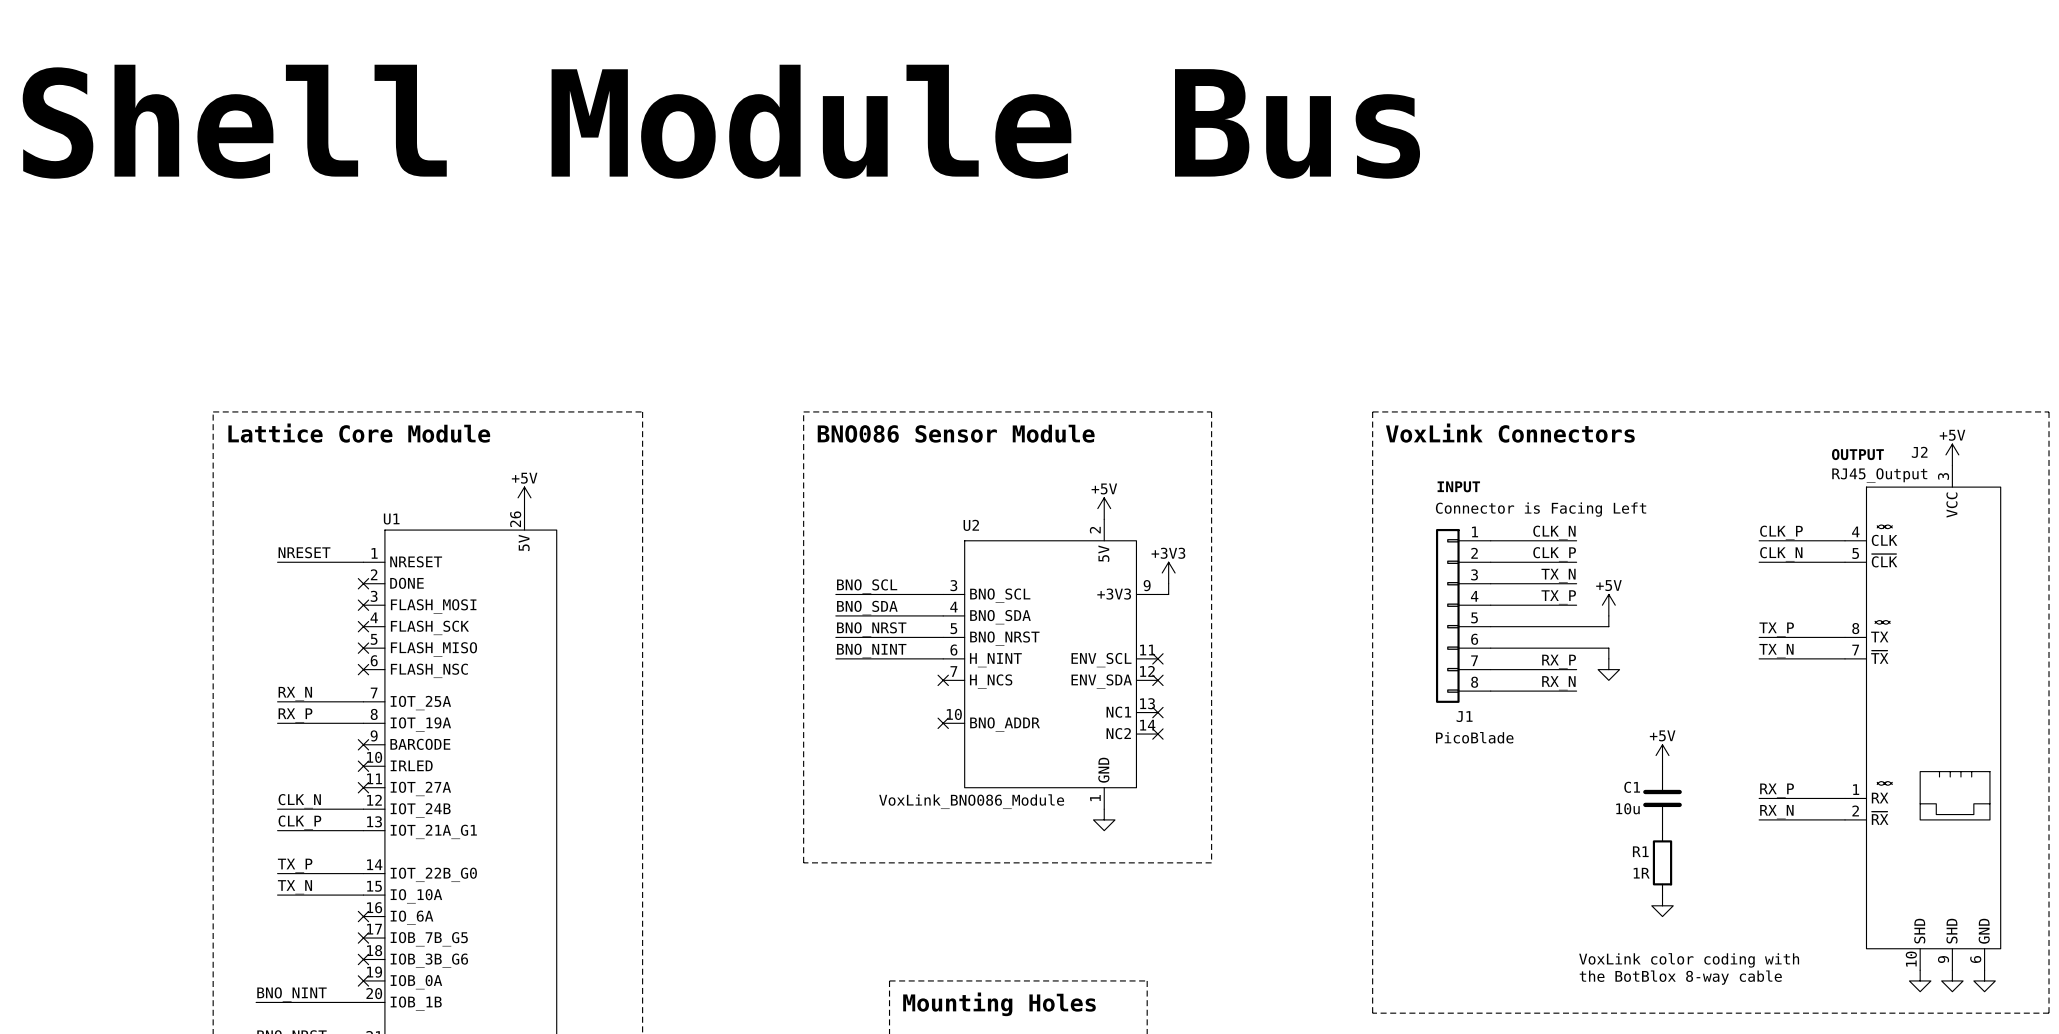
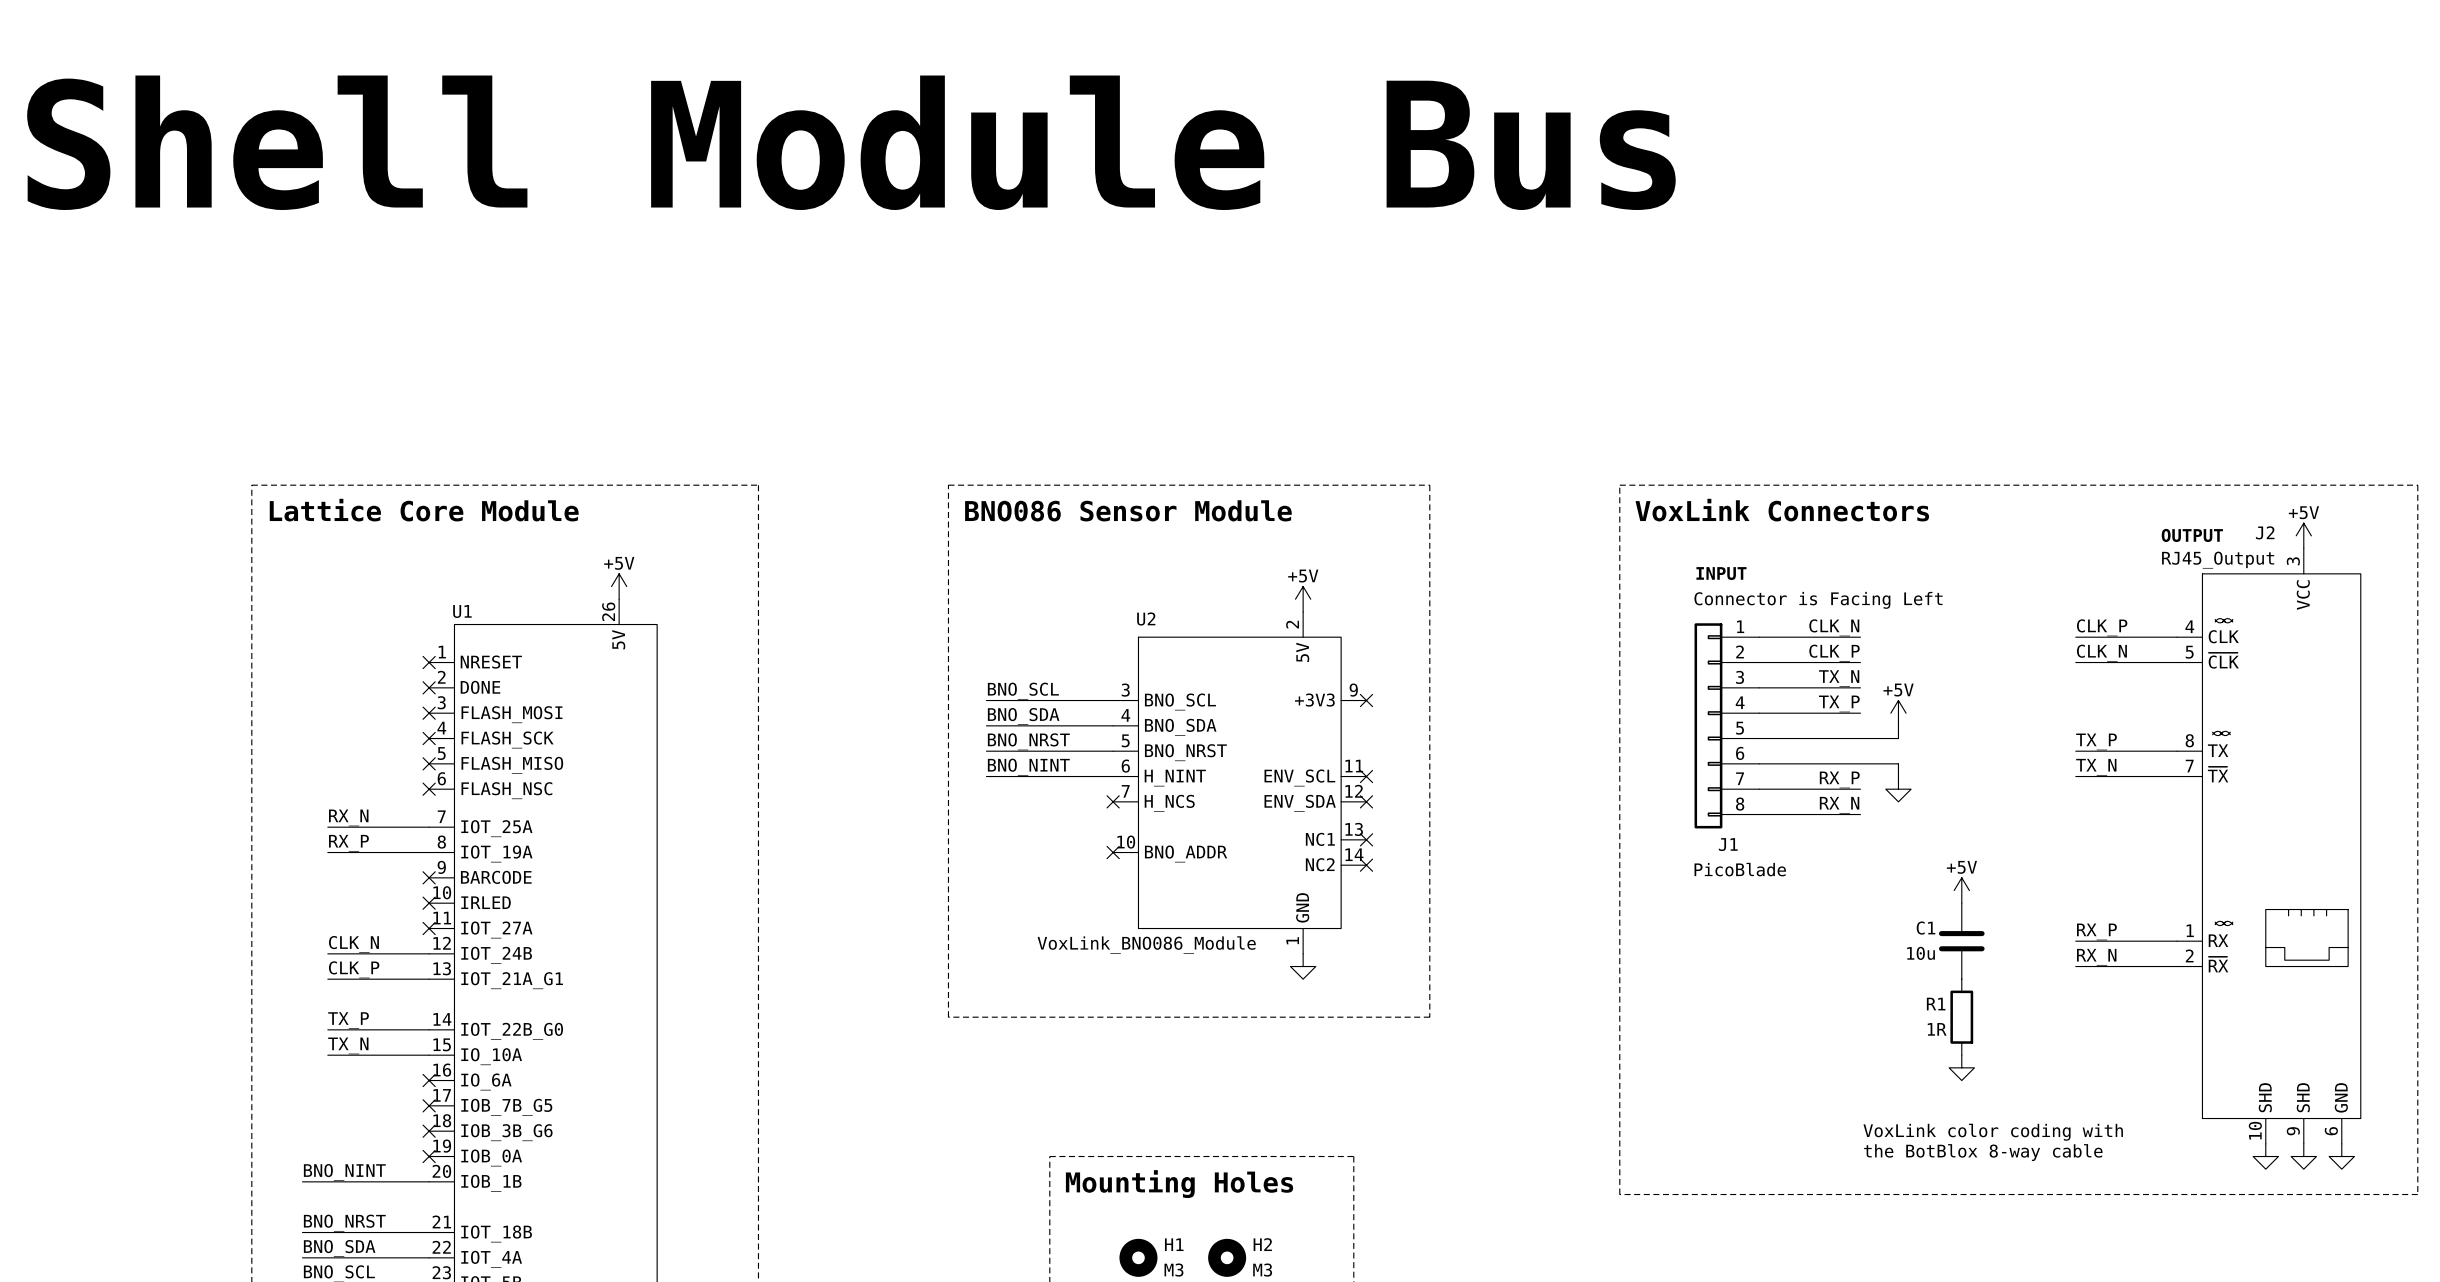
label: NRESET (304, 552) -> none
wire: (277, 562) (363, 562) -> none
no-connect mark: none -> (429, 662)
power symbol: +3V3 (1168, 573) -> none
wire: (1168, 583) (1168, 594) (1157, 594) -> none
no-connect mark: none -> (1366, 700)

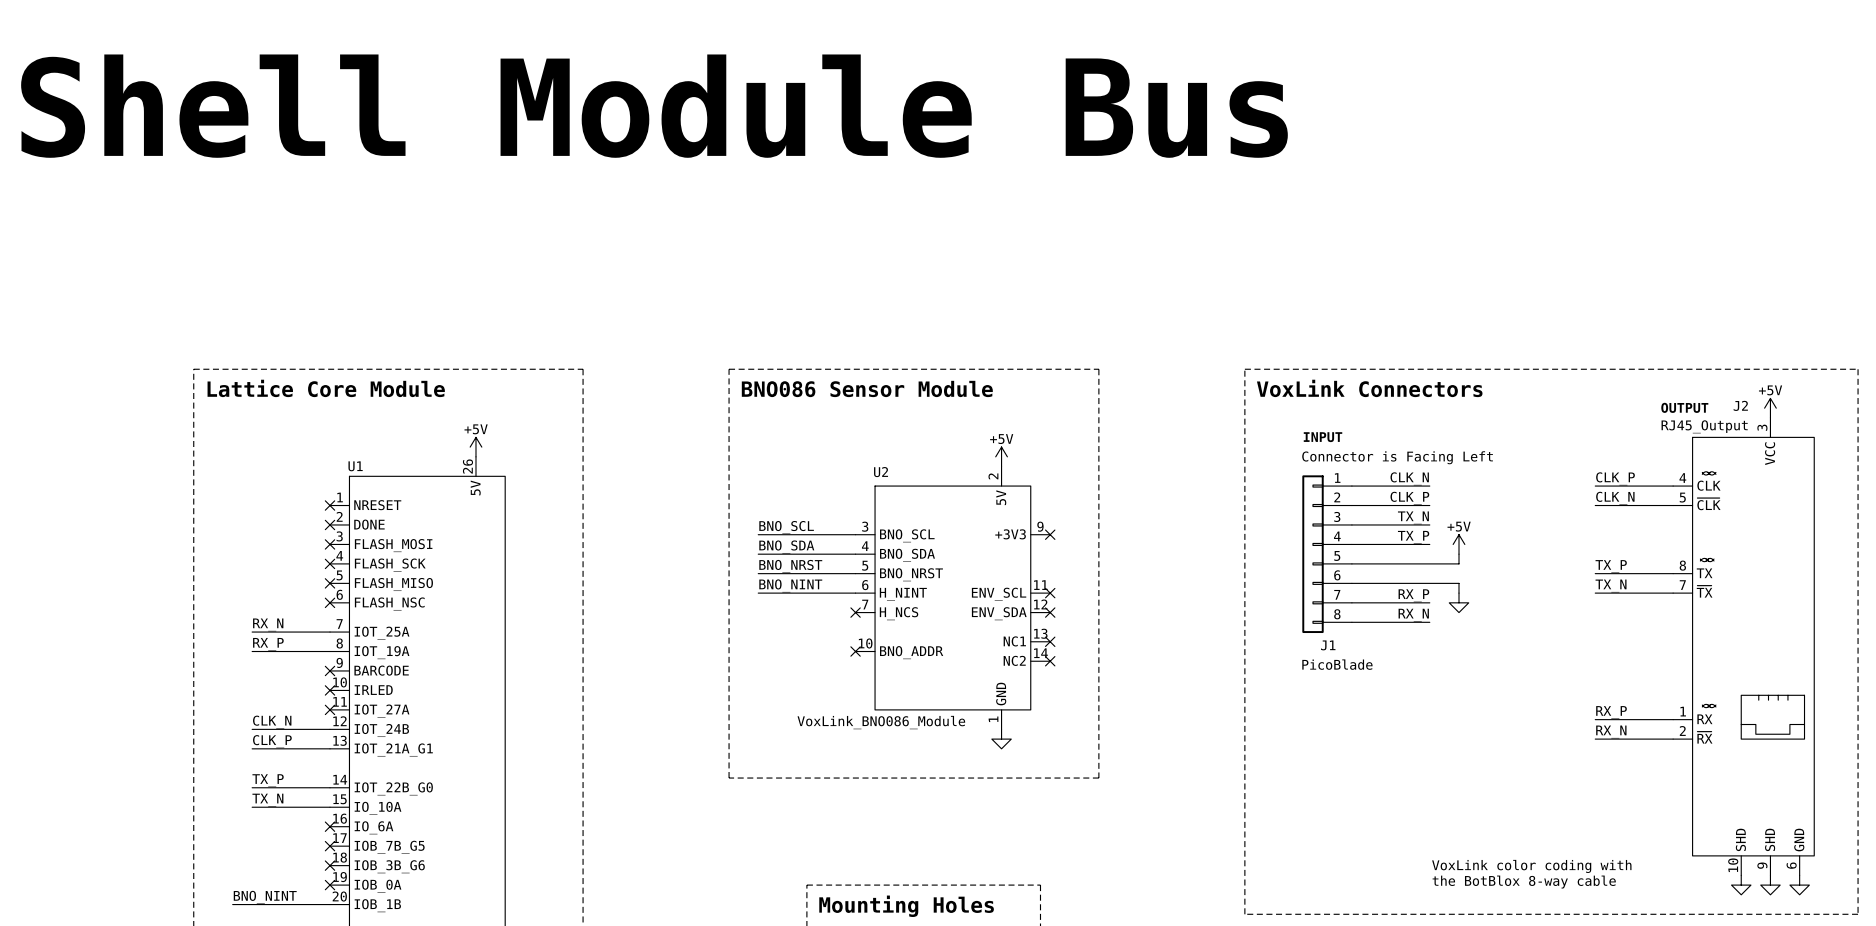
power symbol: +5V (1961, 890) -> none
C1: 10u (1961, 941) -> none
R1: 1R (1961, 1017) -> none
power symbol: (1961, 1067) -> none

